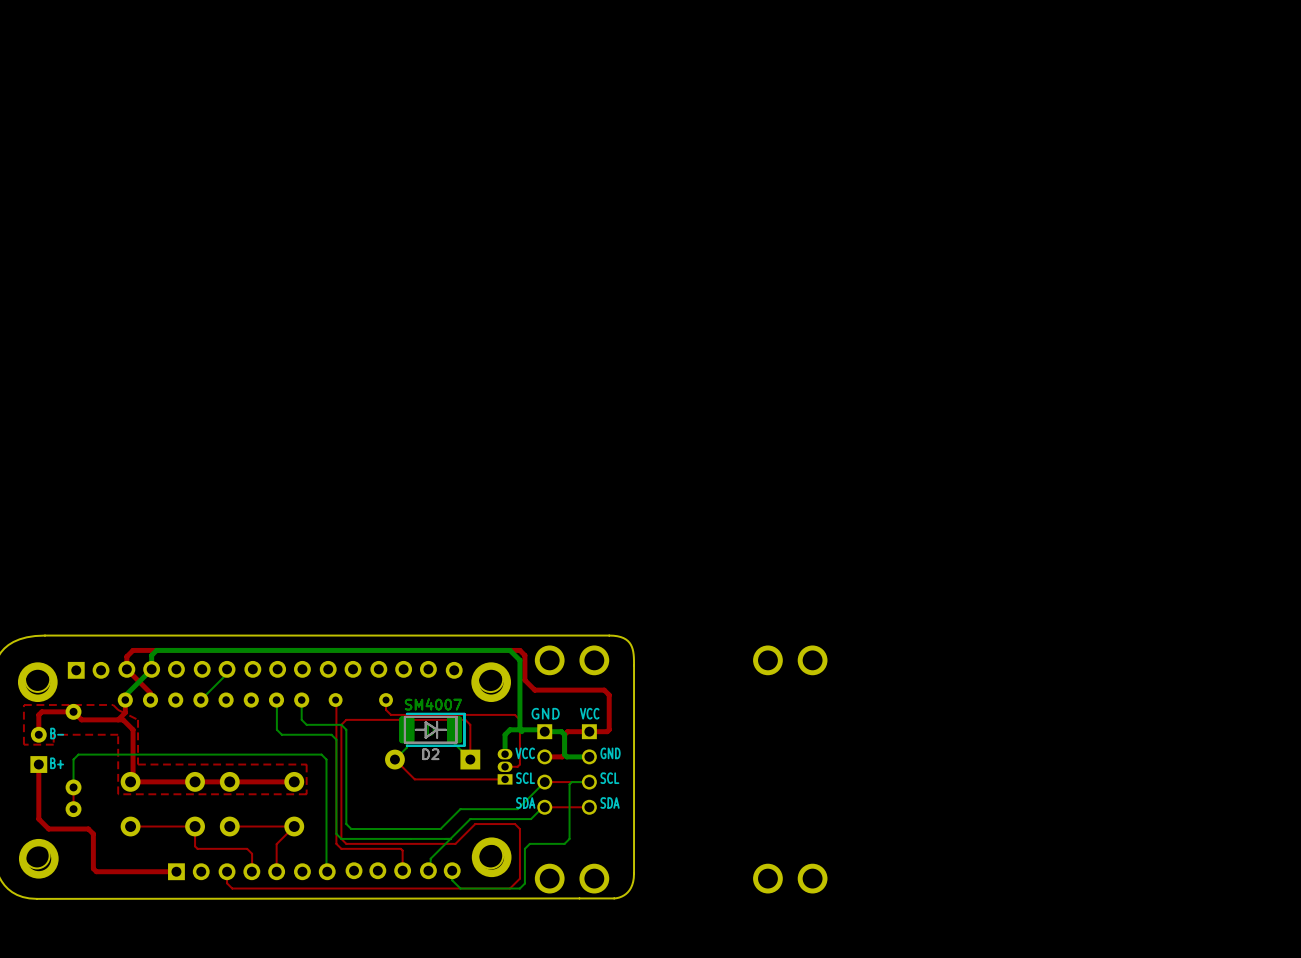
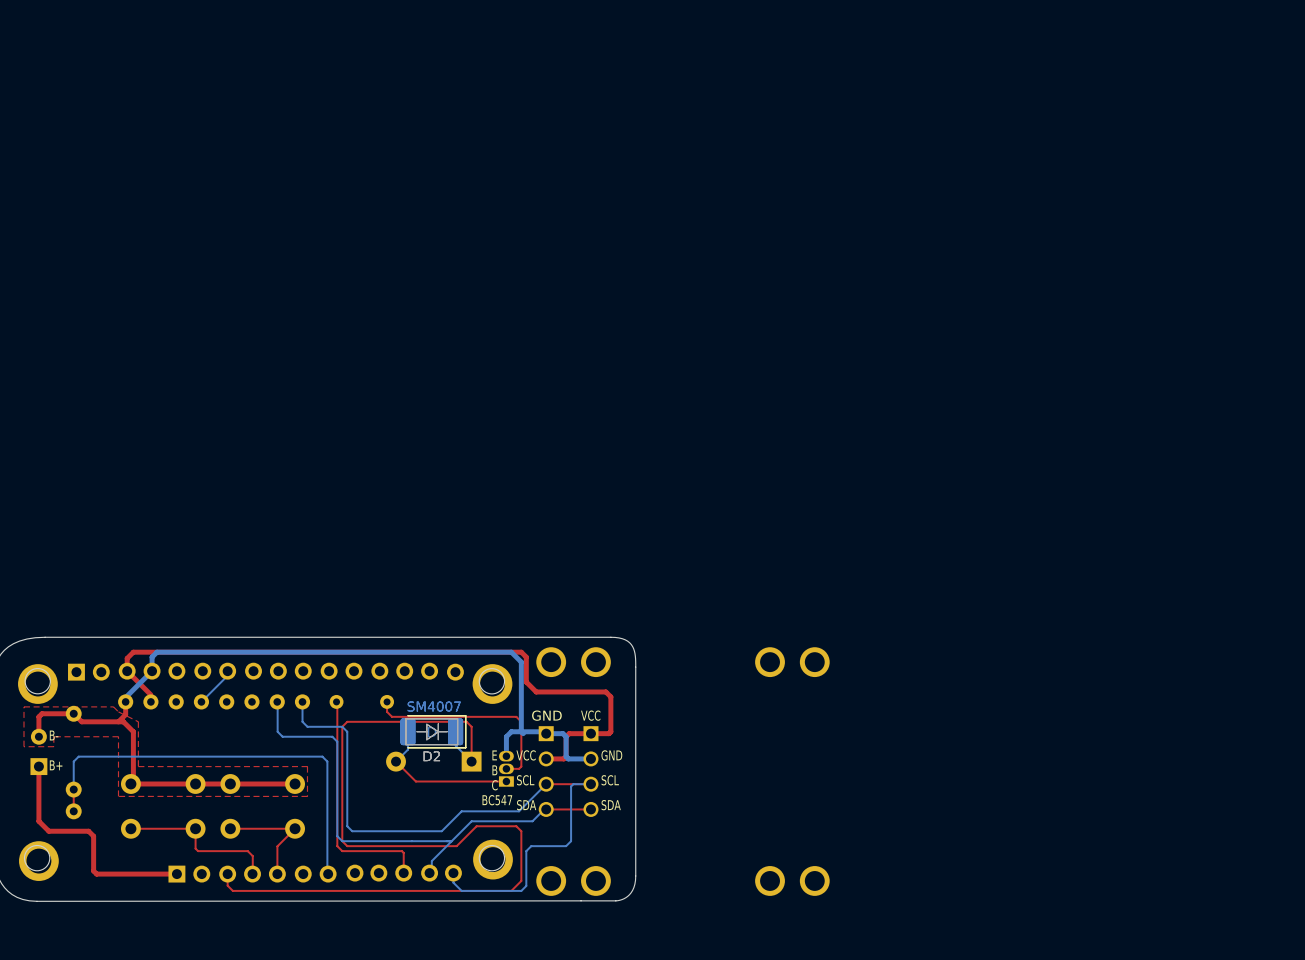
text: none -> E (494, 755)
text: none -> B (494, 770)
text: none -> C (494, 785)
text: none -> BC547 (497, 800)

